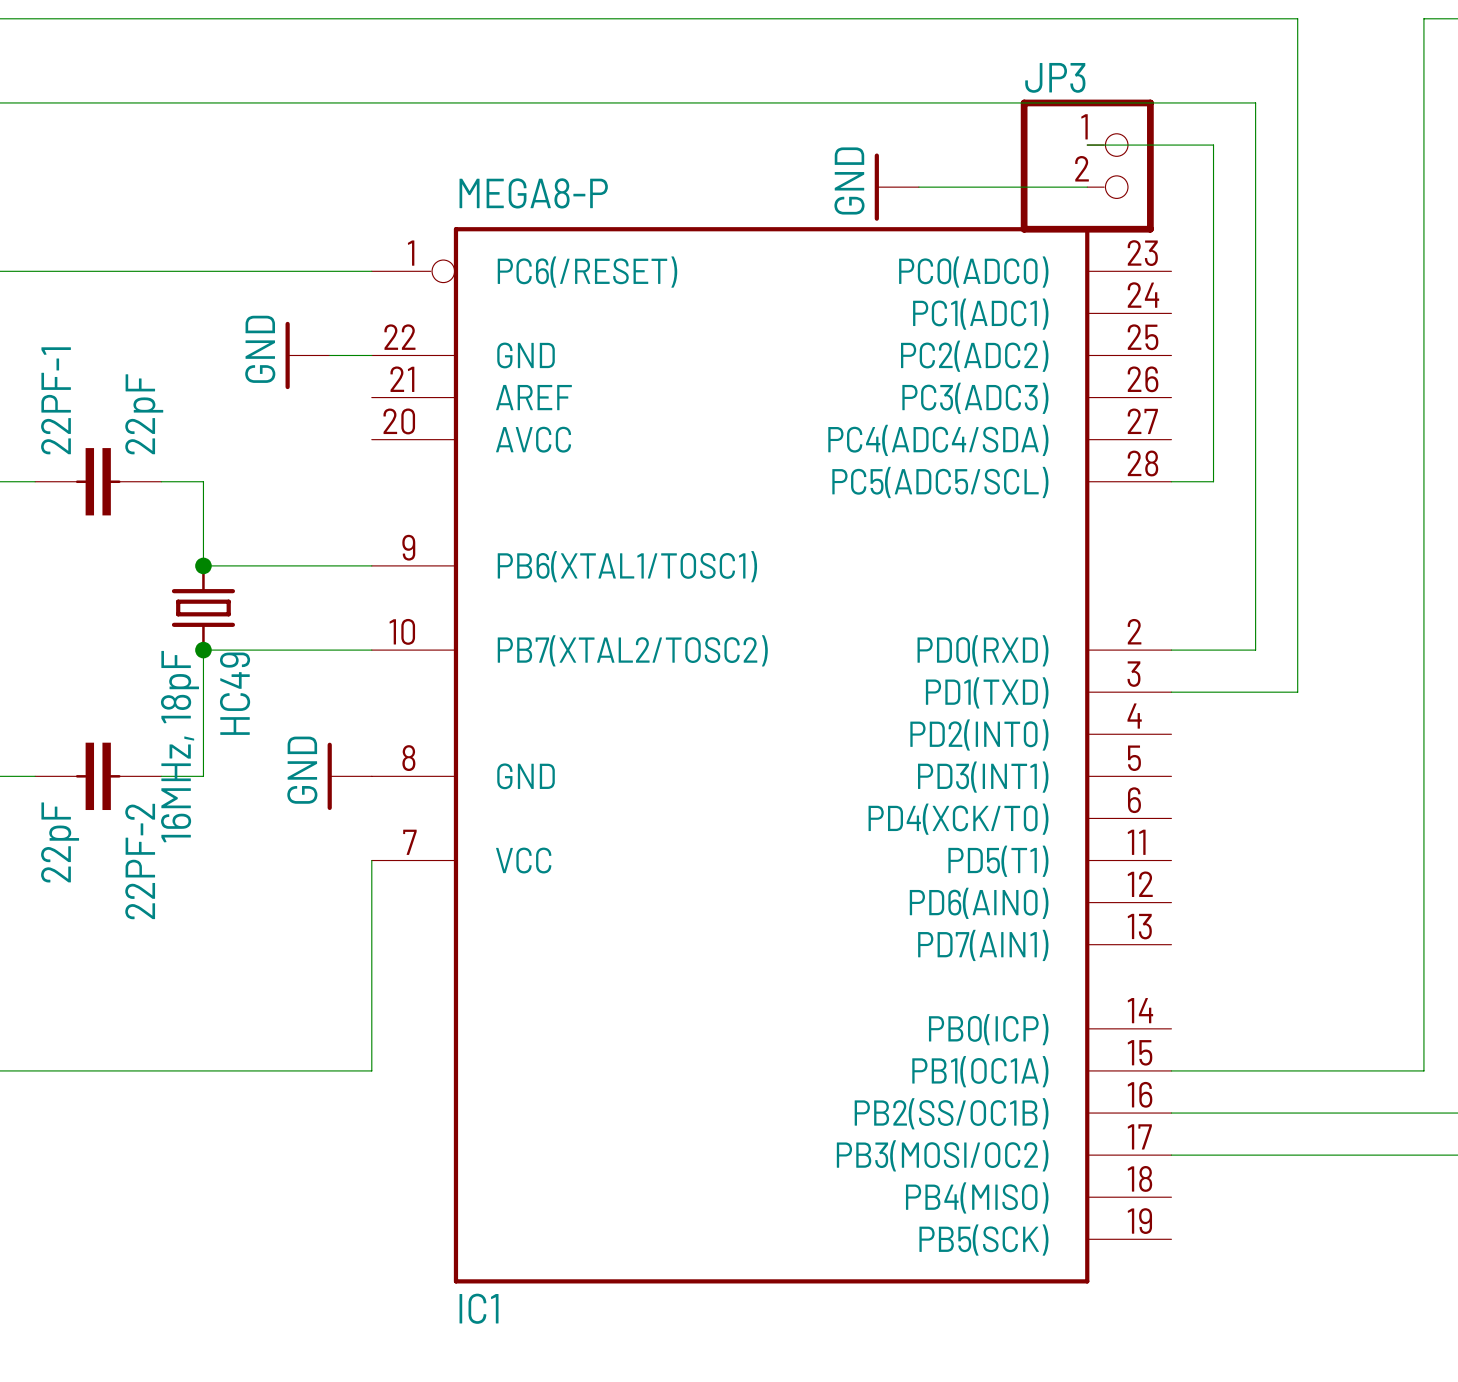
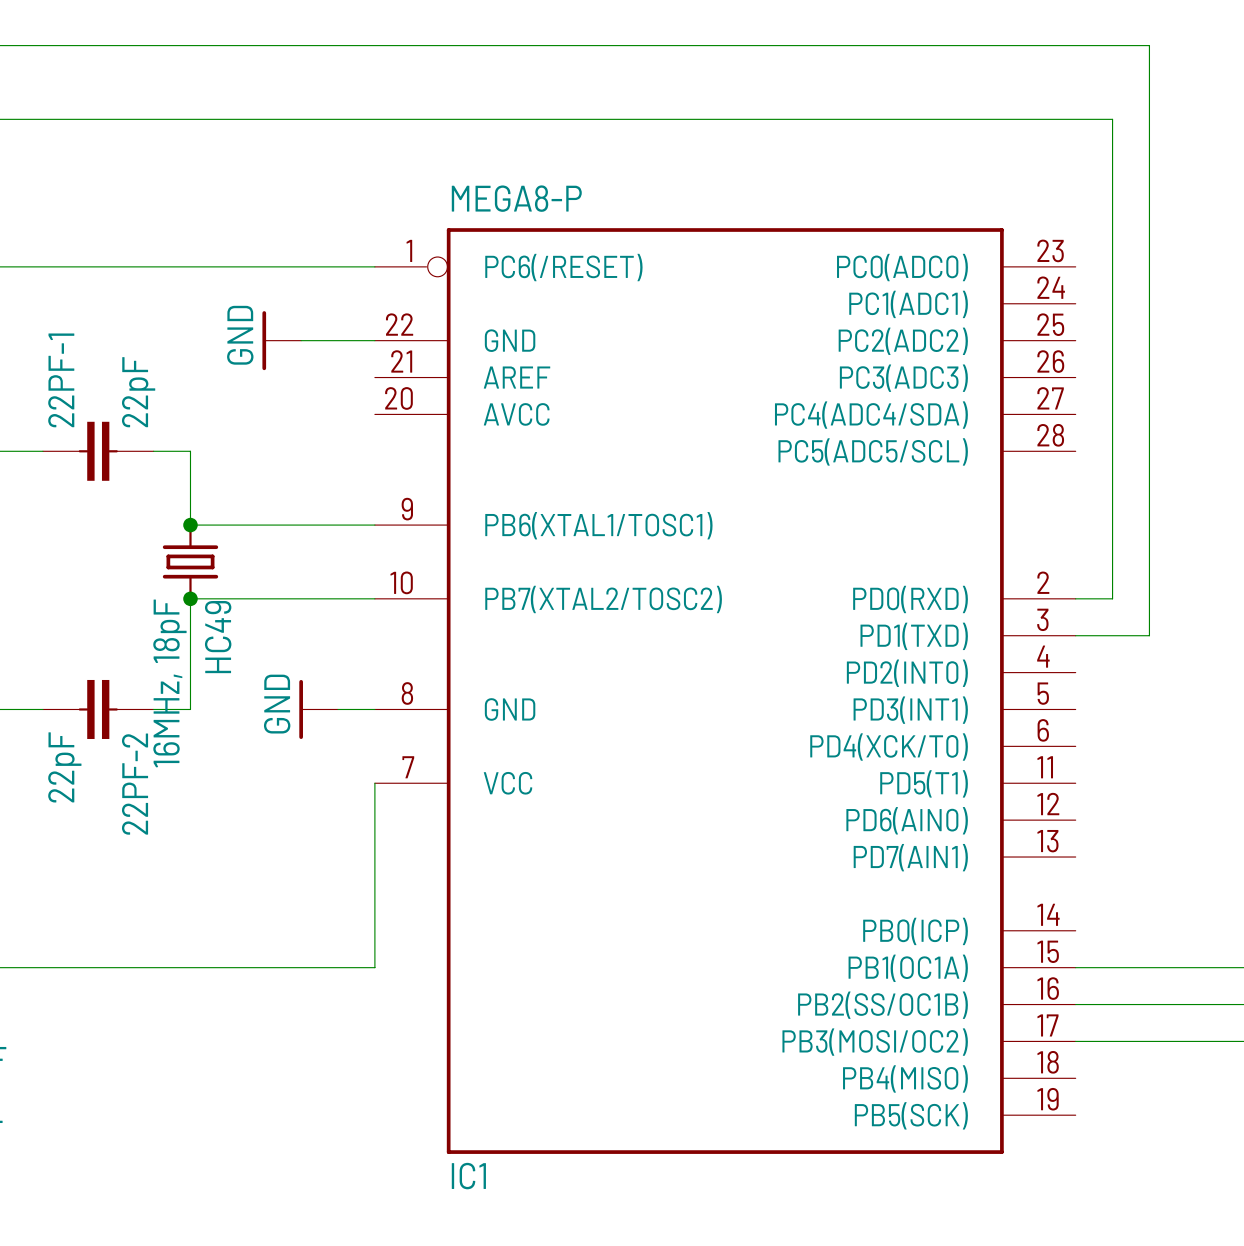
wire: (1087, 145) (1213, 145) (1213, 481) (1171, 481) -> none
JP3: (1087, 166) -> none
power symbol: GND (896, 187) -> none
wire: (918, 187) (1087, 187) -> none
IC1 position: (771, 755) -> (725, 691)
wire: (371, 860) (371, 1070) -> (374, 783) (374, 967) (338, 967)

